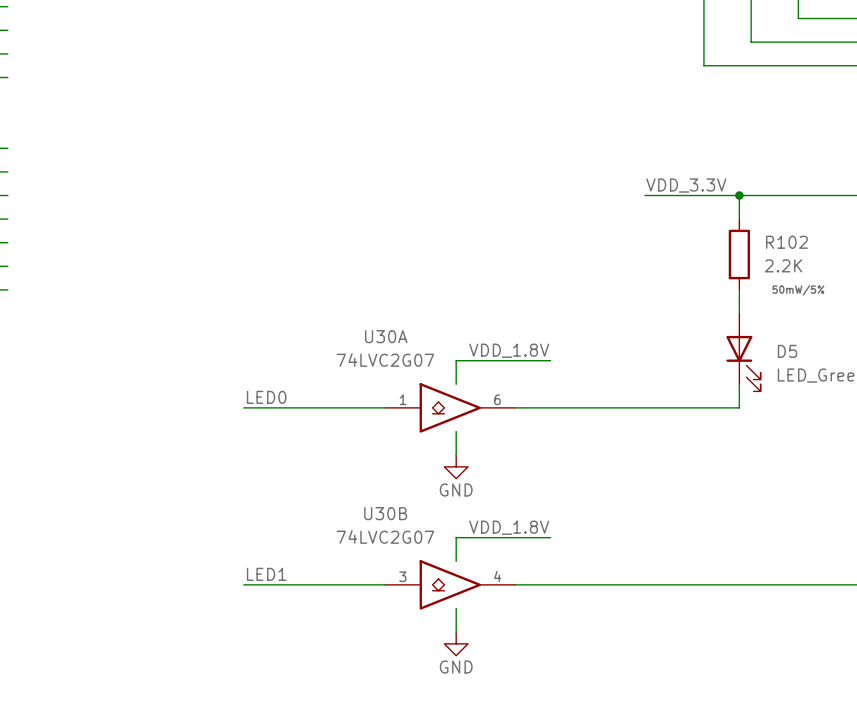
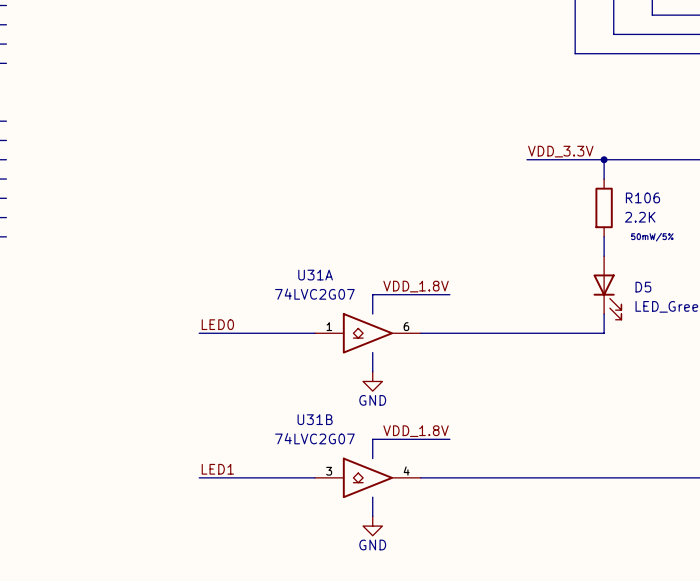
R102 name: R102 (786, 242) -> R106 (642, 197)
U30A name: U30A (386, 336) -> U31A (315, 275)
U30B name: U30B (385, 513) -> U31B (315, 419)

